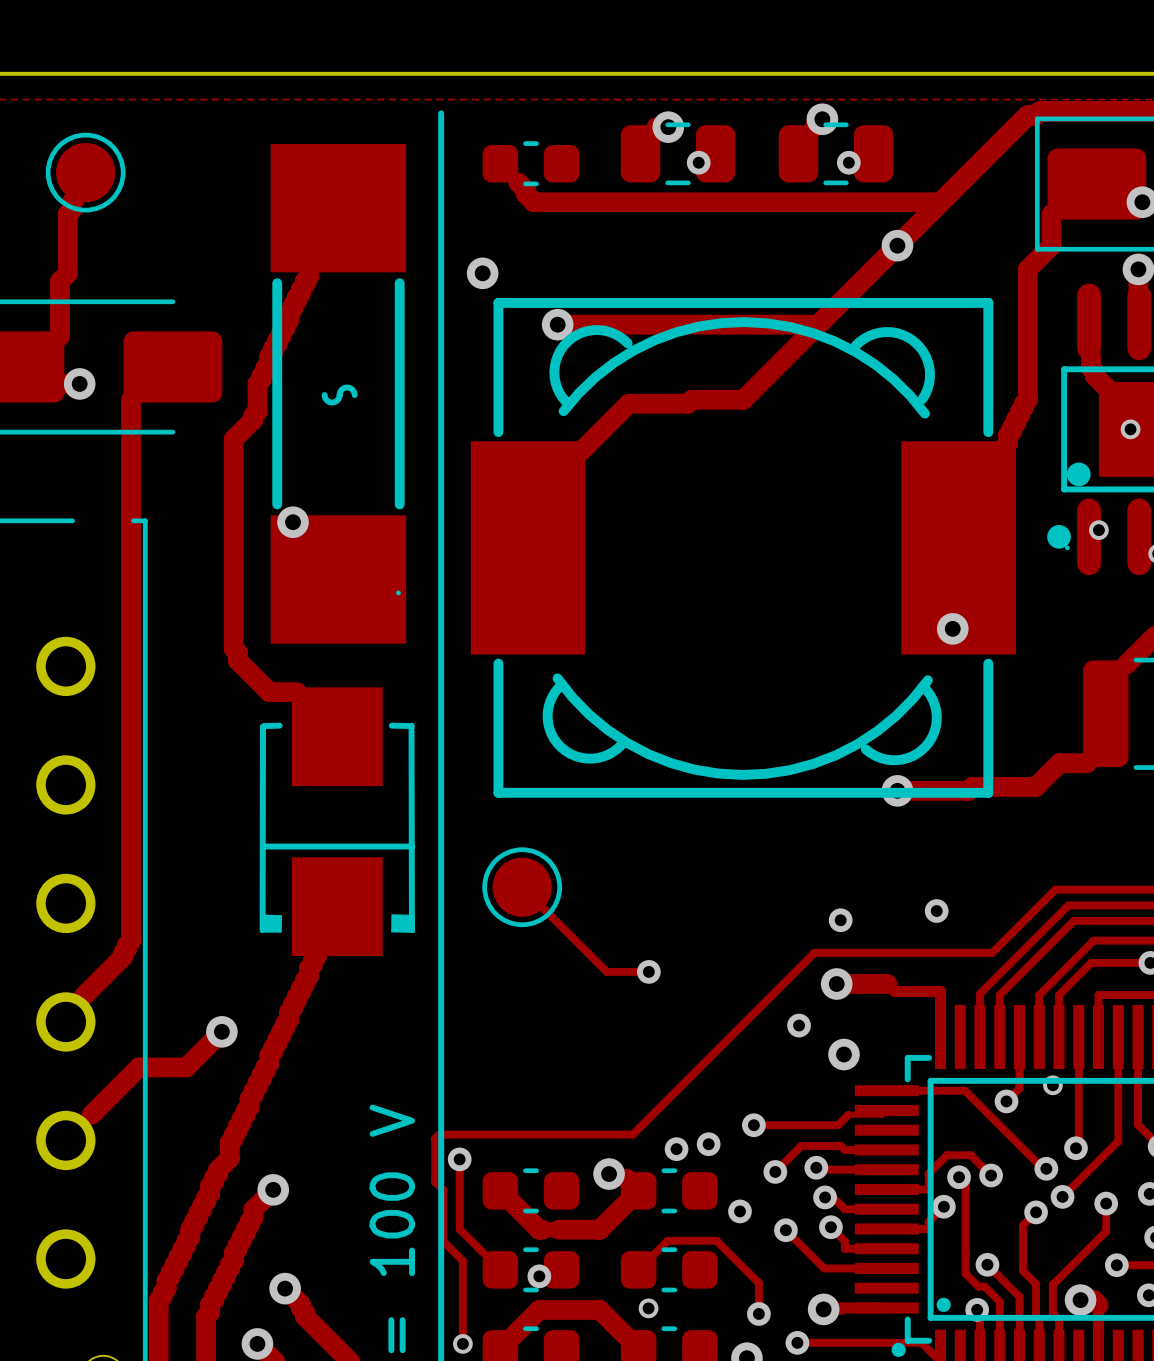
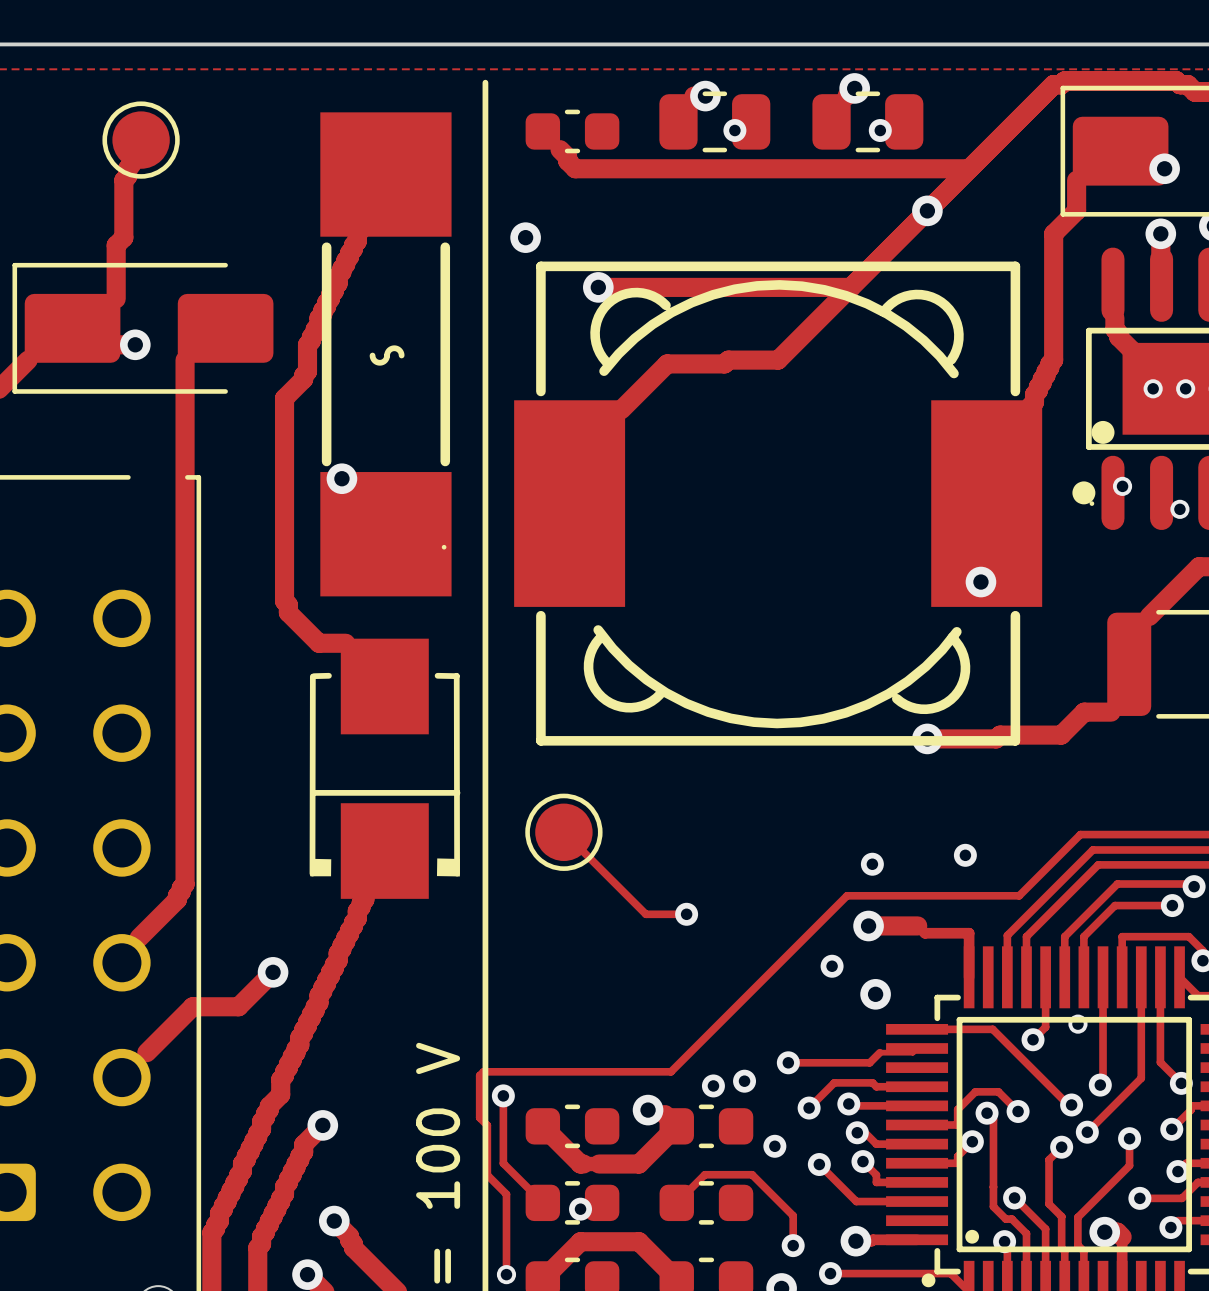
via: (648, 1308) -> none

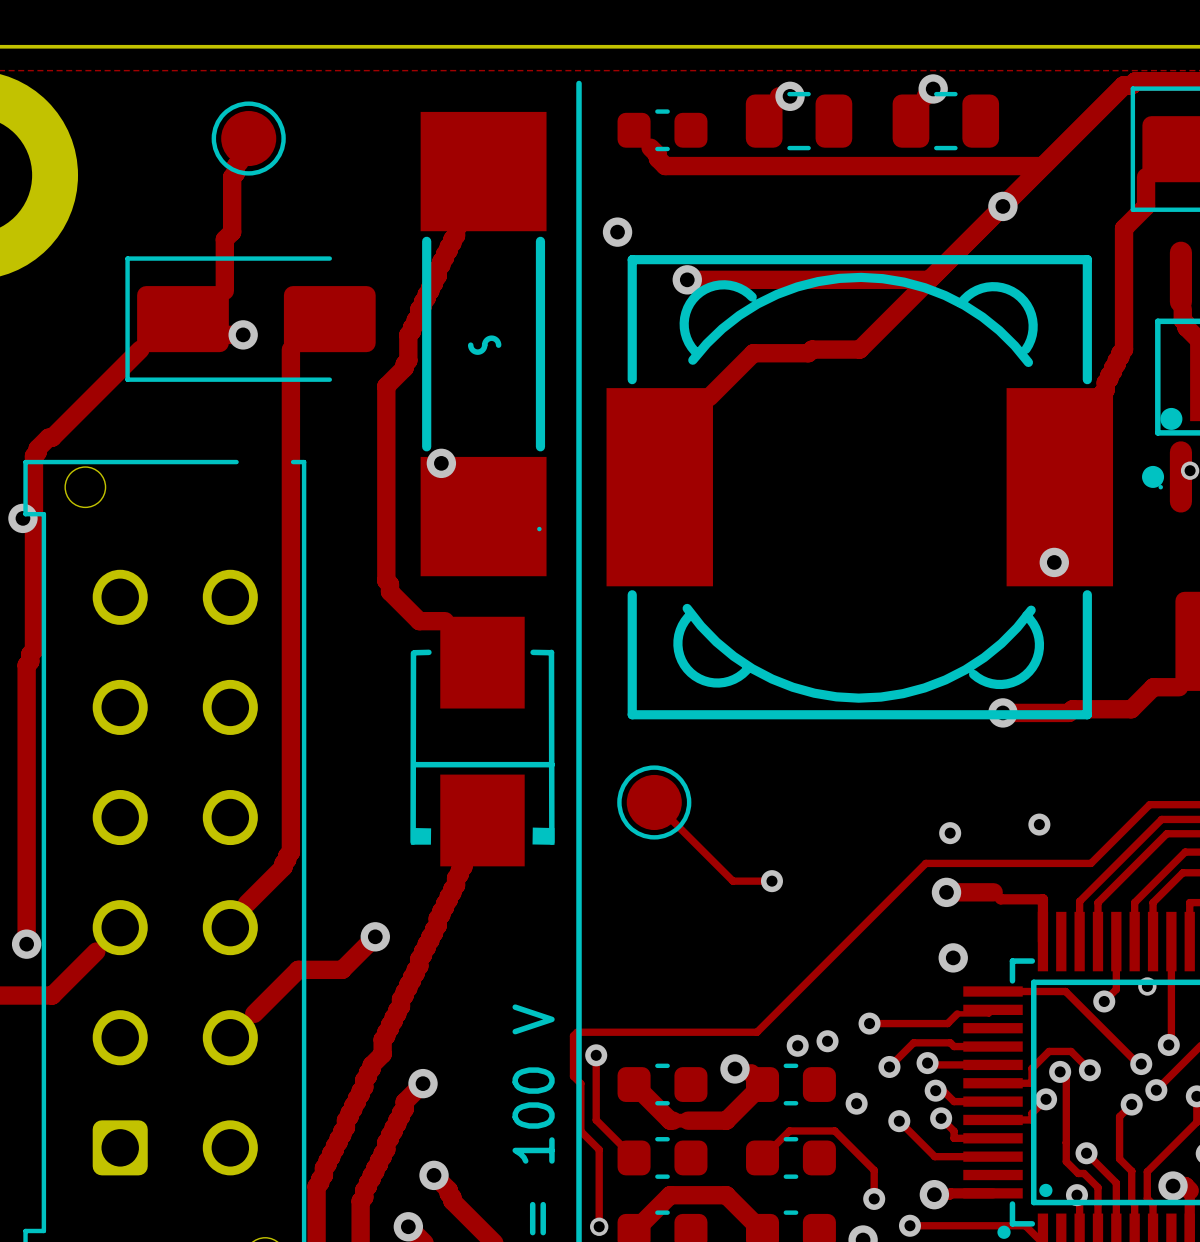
via: (734, 130) -> none
via: (880, 130) -> none
via: (832, 966) -> none
via: (580, 1209) -> none

